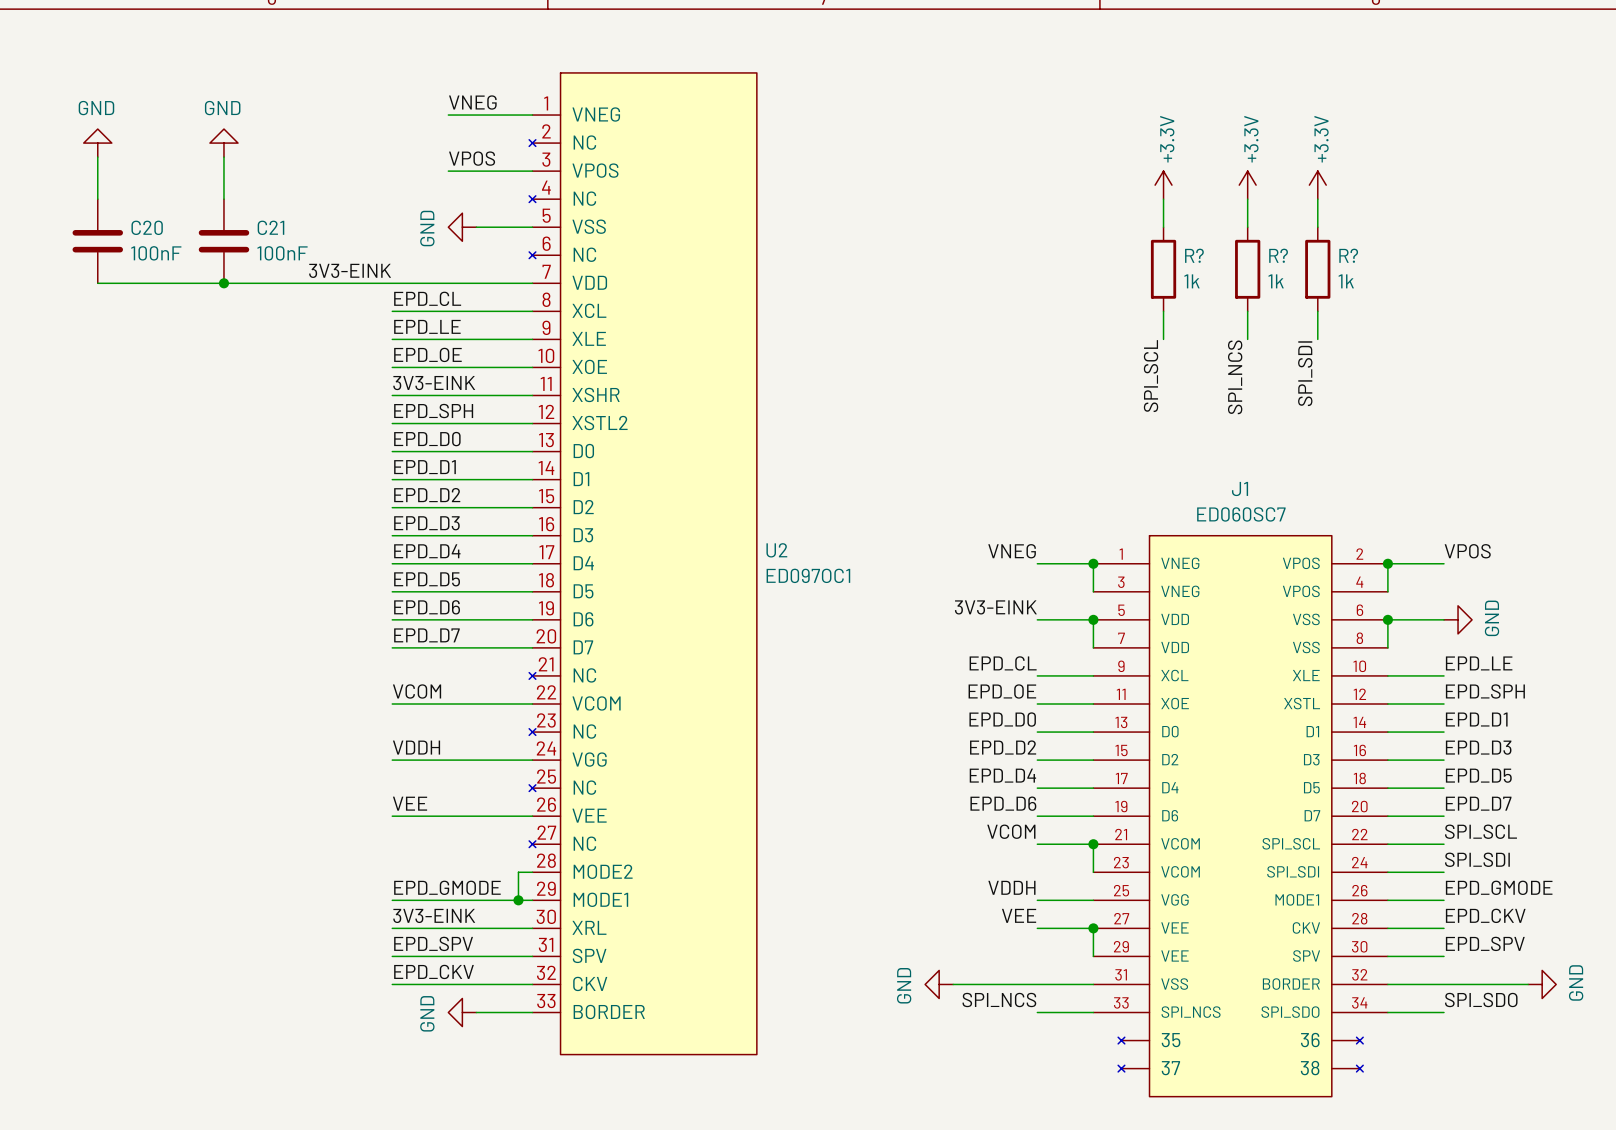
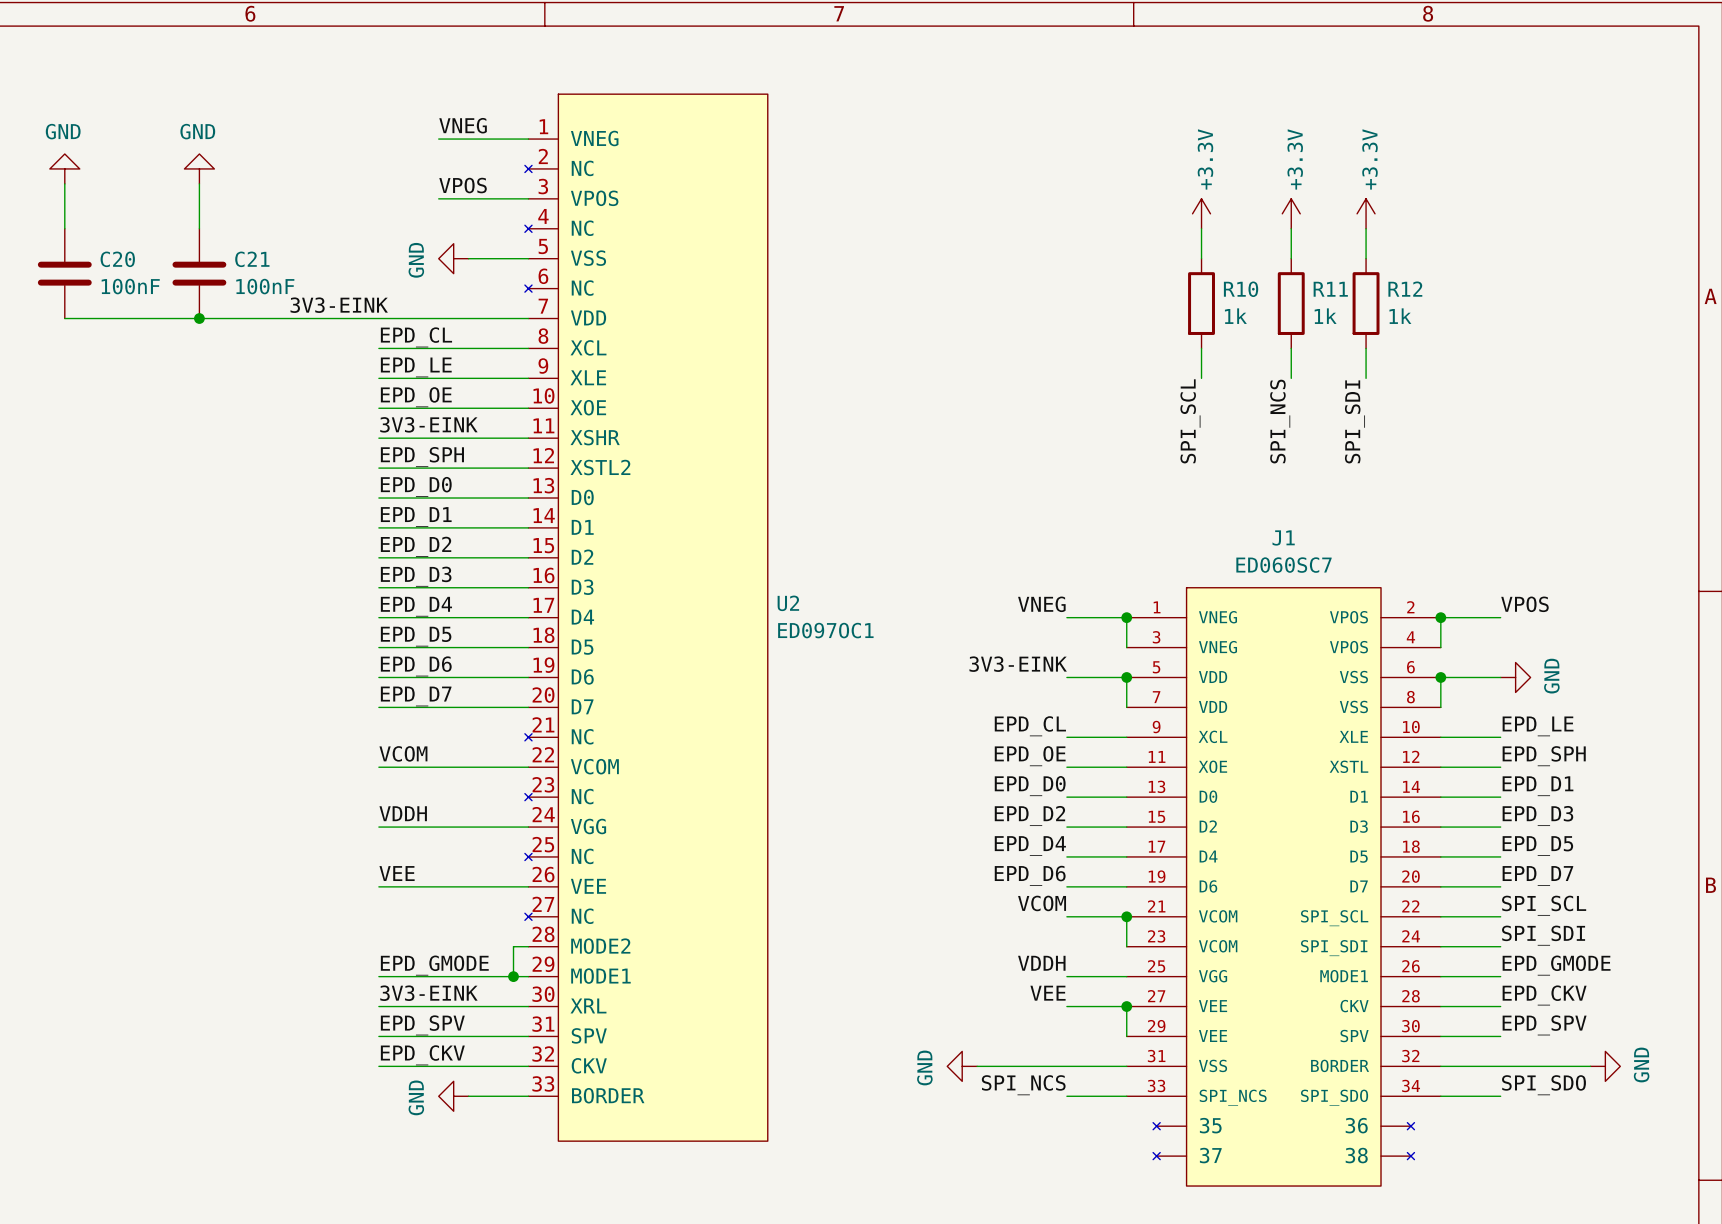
R? name: R? (1194, 255) -> R10 (1241, 289)
R? name: R? (1278, 255) -> R11 (1330, 289)
R? name: R? (1348, 255) -> R12 (1405, 289)

